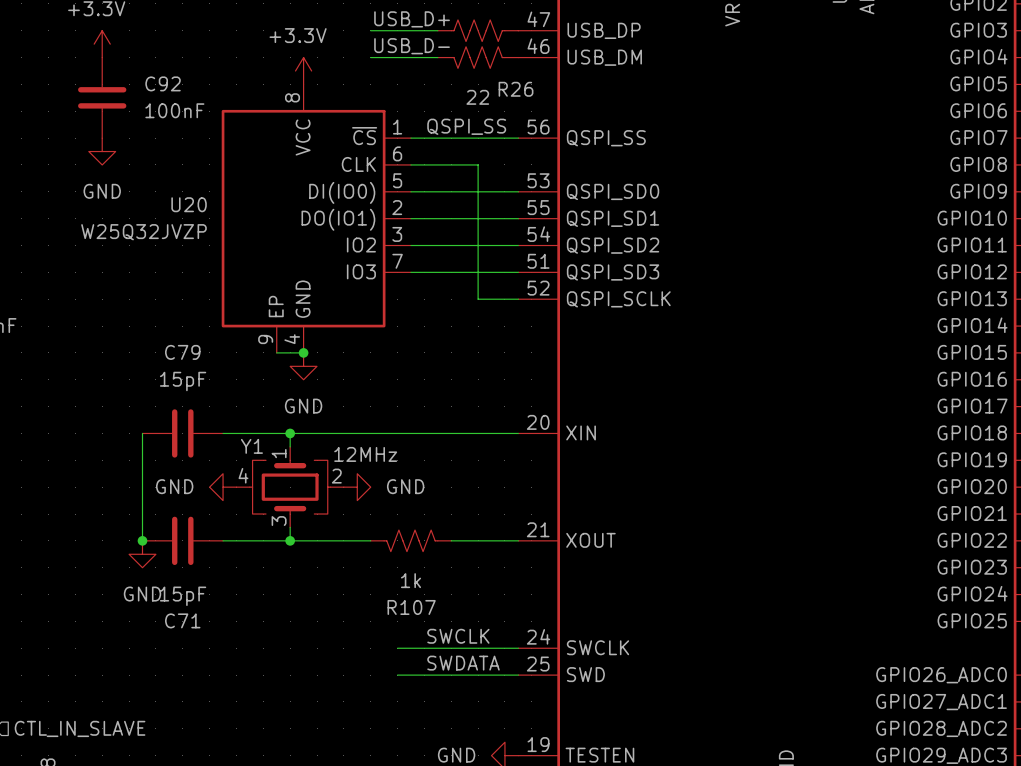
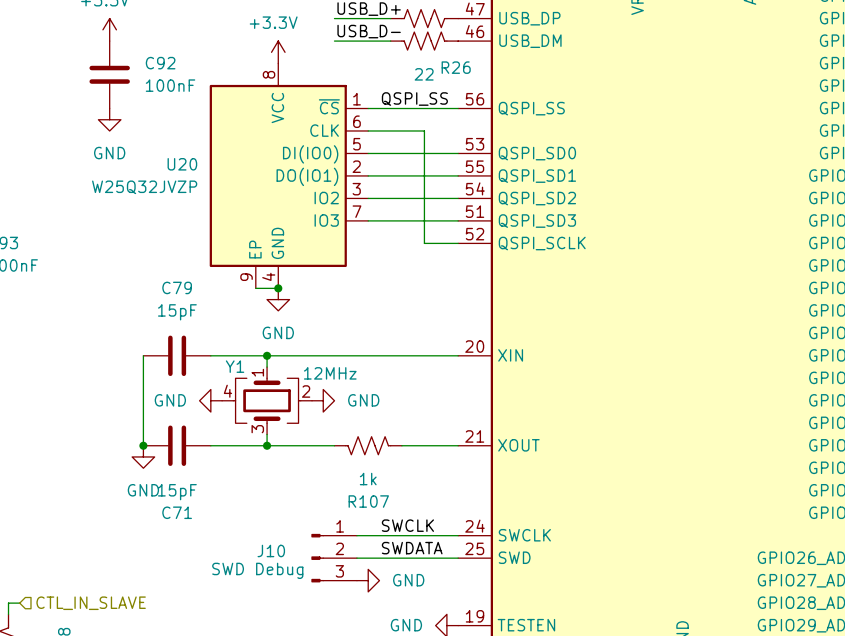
J10: none -> SWD Debug (334, 558)
power symbol: none -> GND (368, 580)

